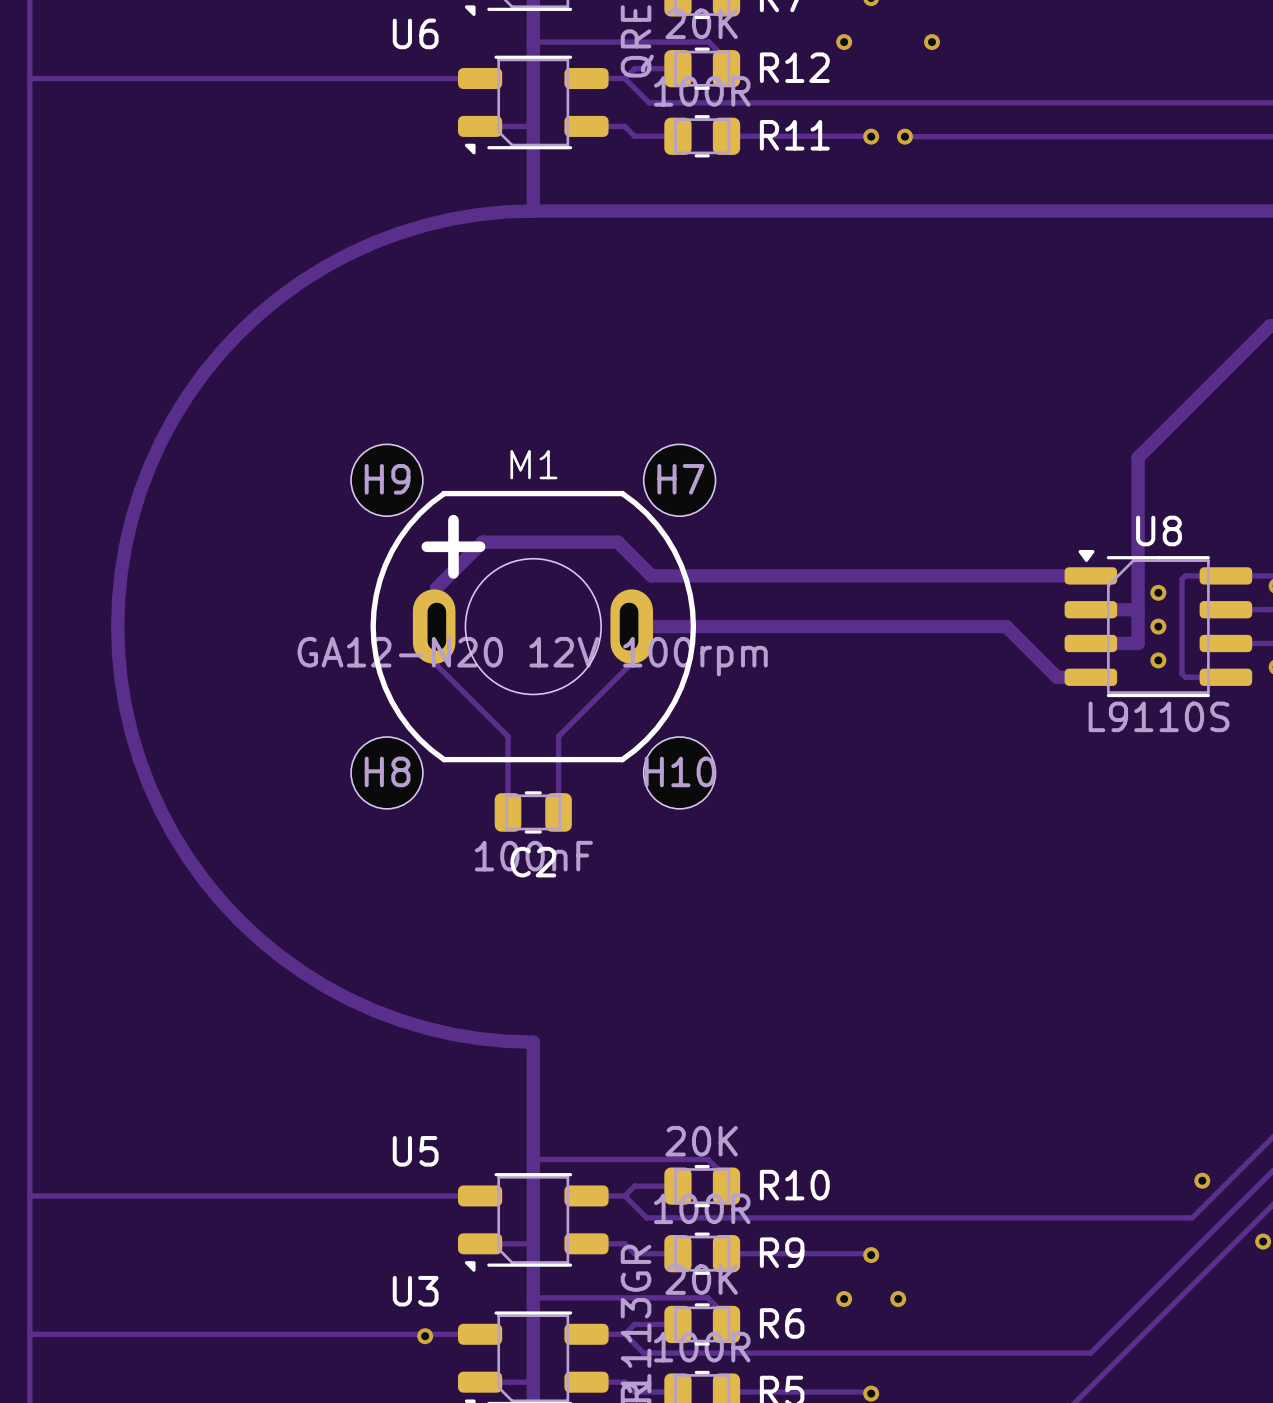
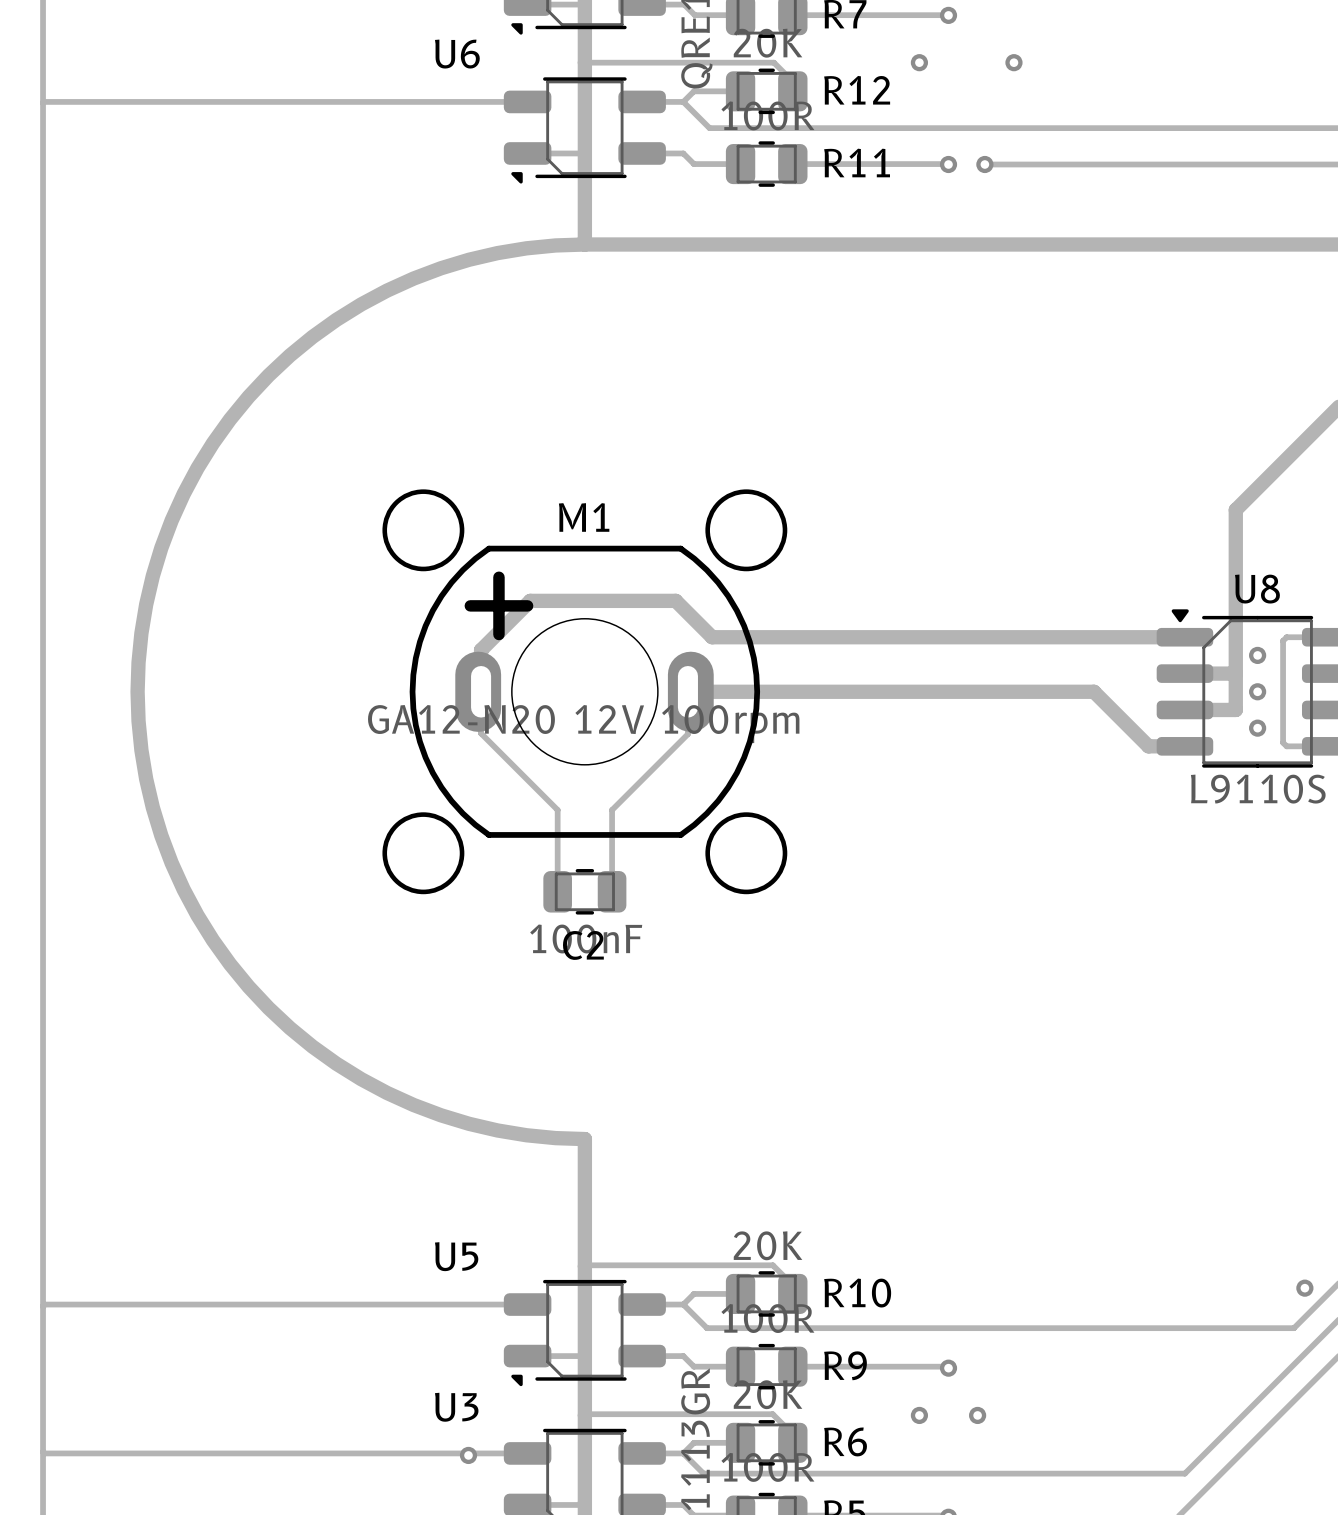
round board edge: none -> [382, 489, 465, 572]
round board edge: none -> [705, 489, 788, 572]
H9: (386, 480) -> none
H7: (679, 480) -> none
round board edge: none -> [382, 812, 465, 895]
round board edge: none -> [705, 812, 788, 895]
H8: (386, 772) -> none
H10: (679, 772) -> none

